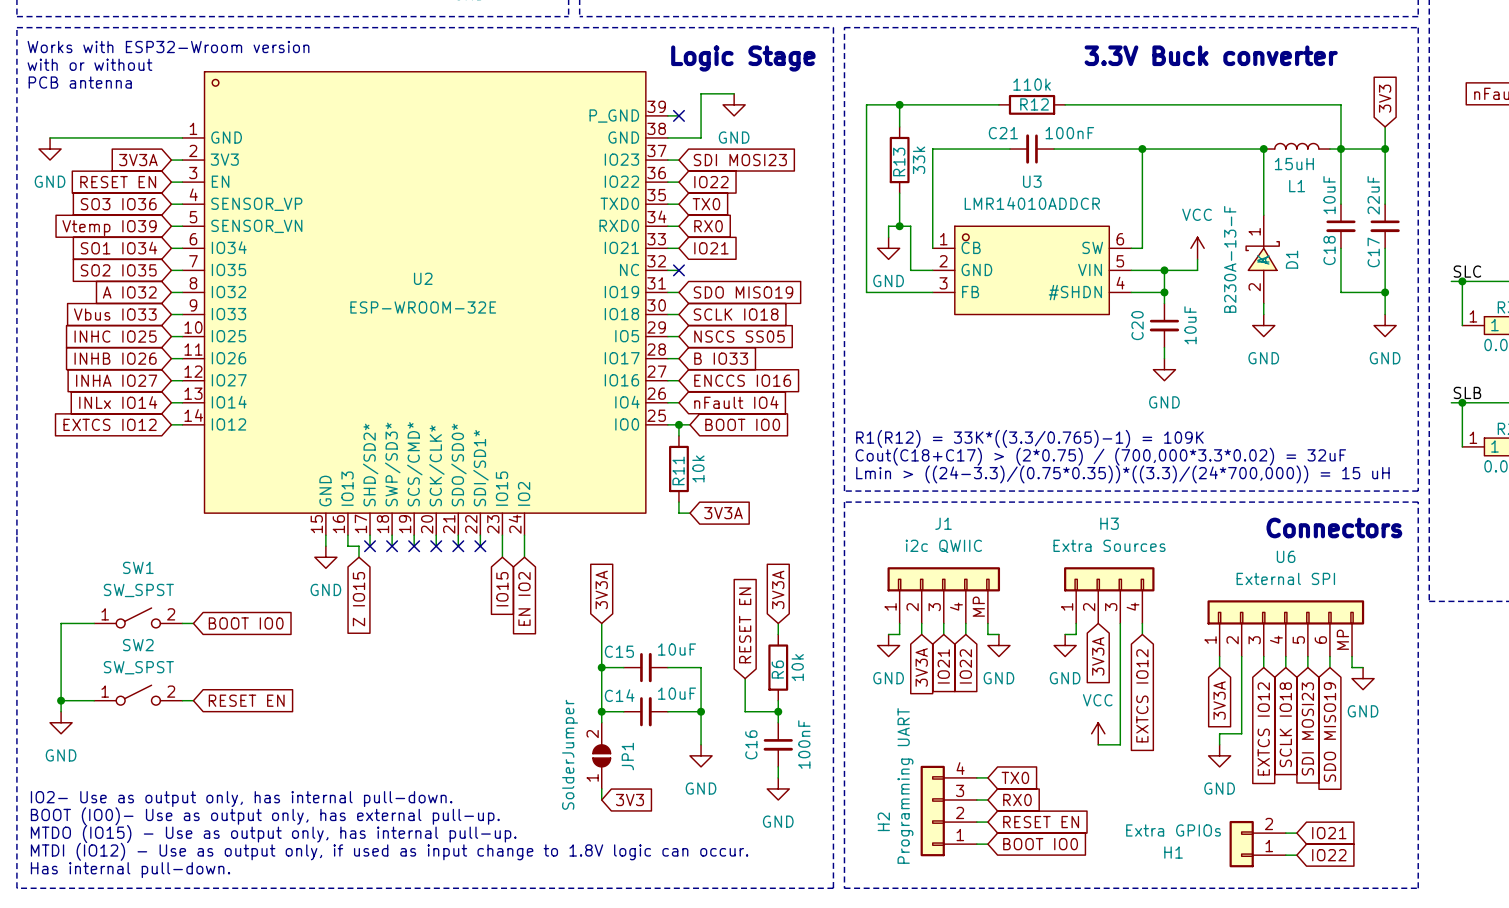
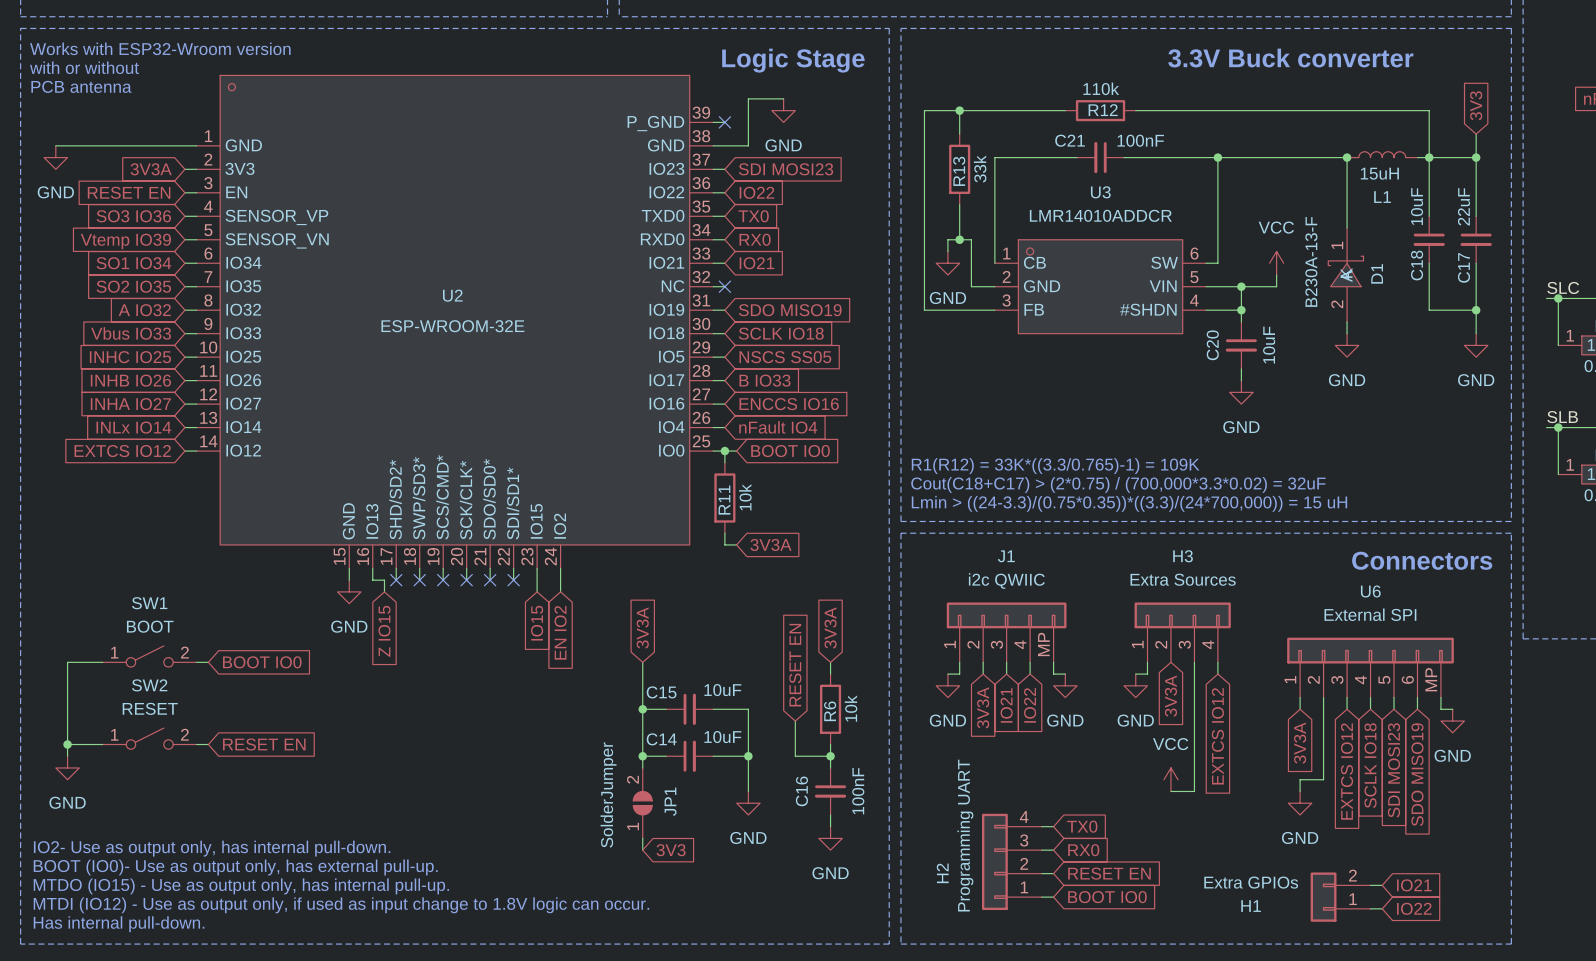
SW1 value: SW_SPST (138, 590) -> BOOT (150, 626)
SW2 value: SW_SPST (138, 667) -> RESET (150, 708)

